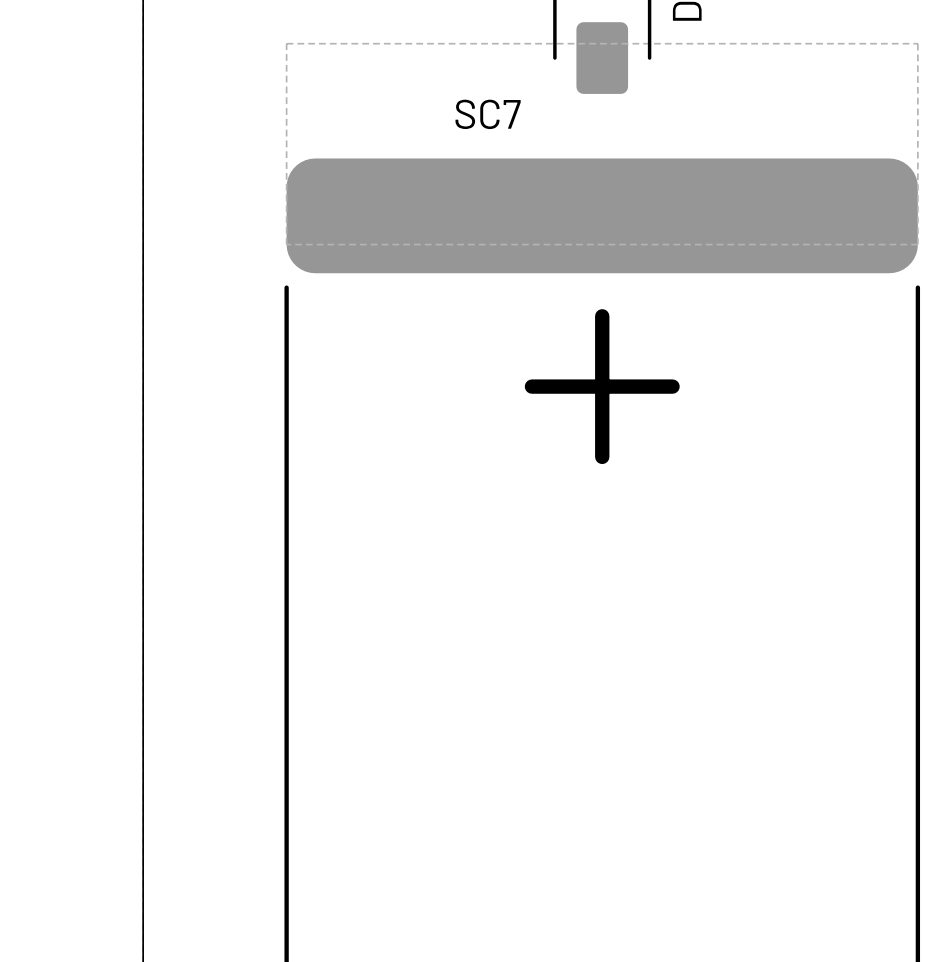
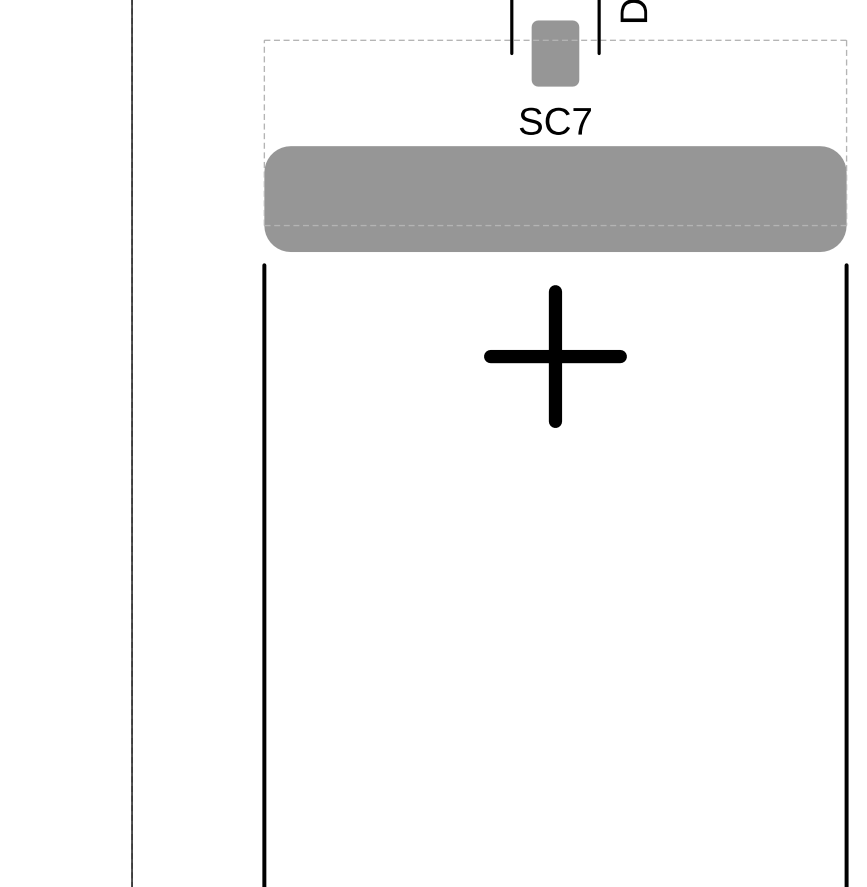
SC7 name position: SC7 (488, 114) -> SC7 (555, 121)

